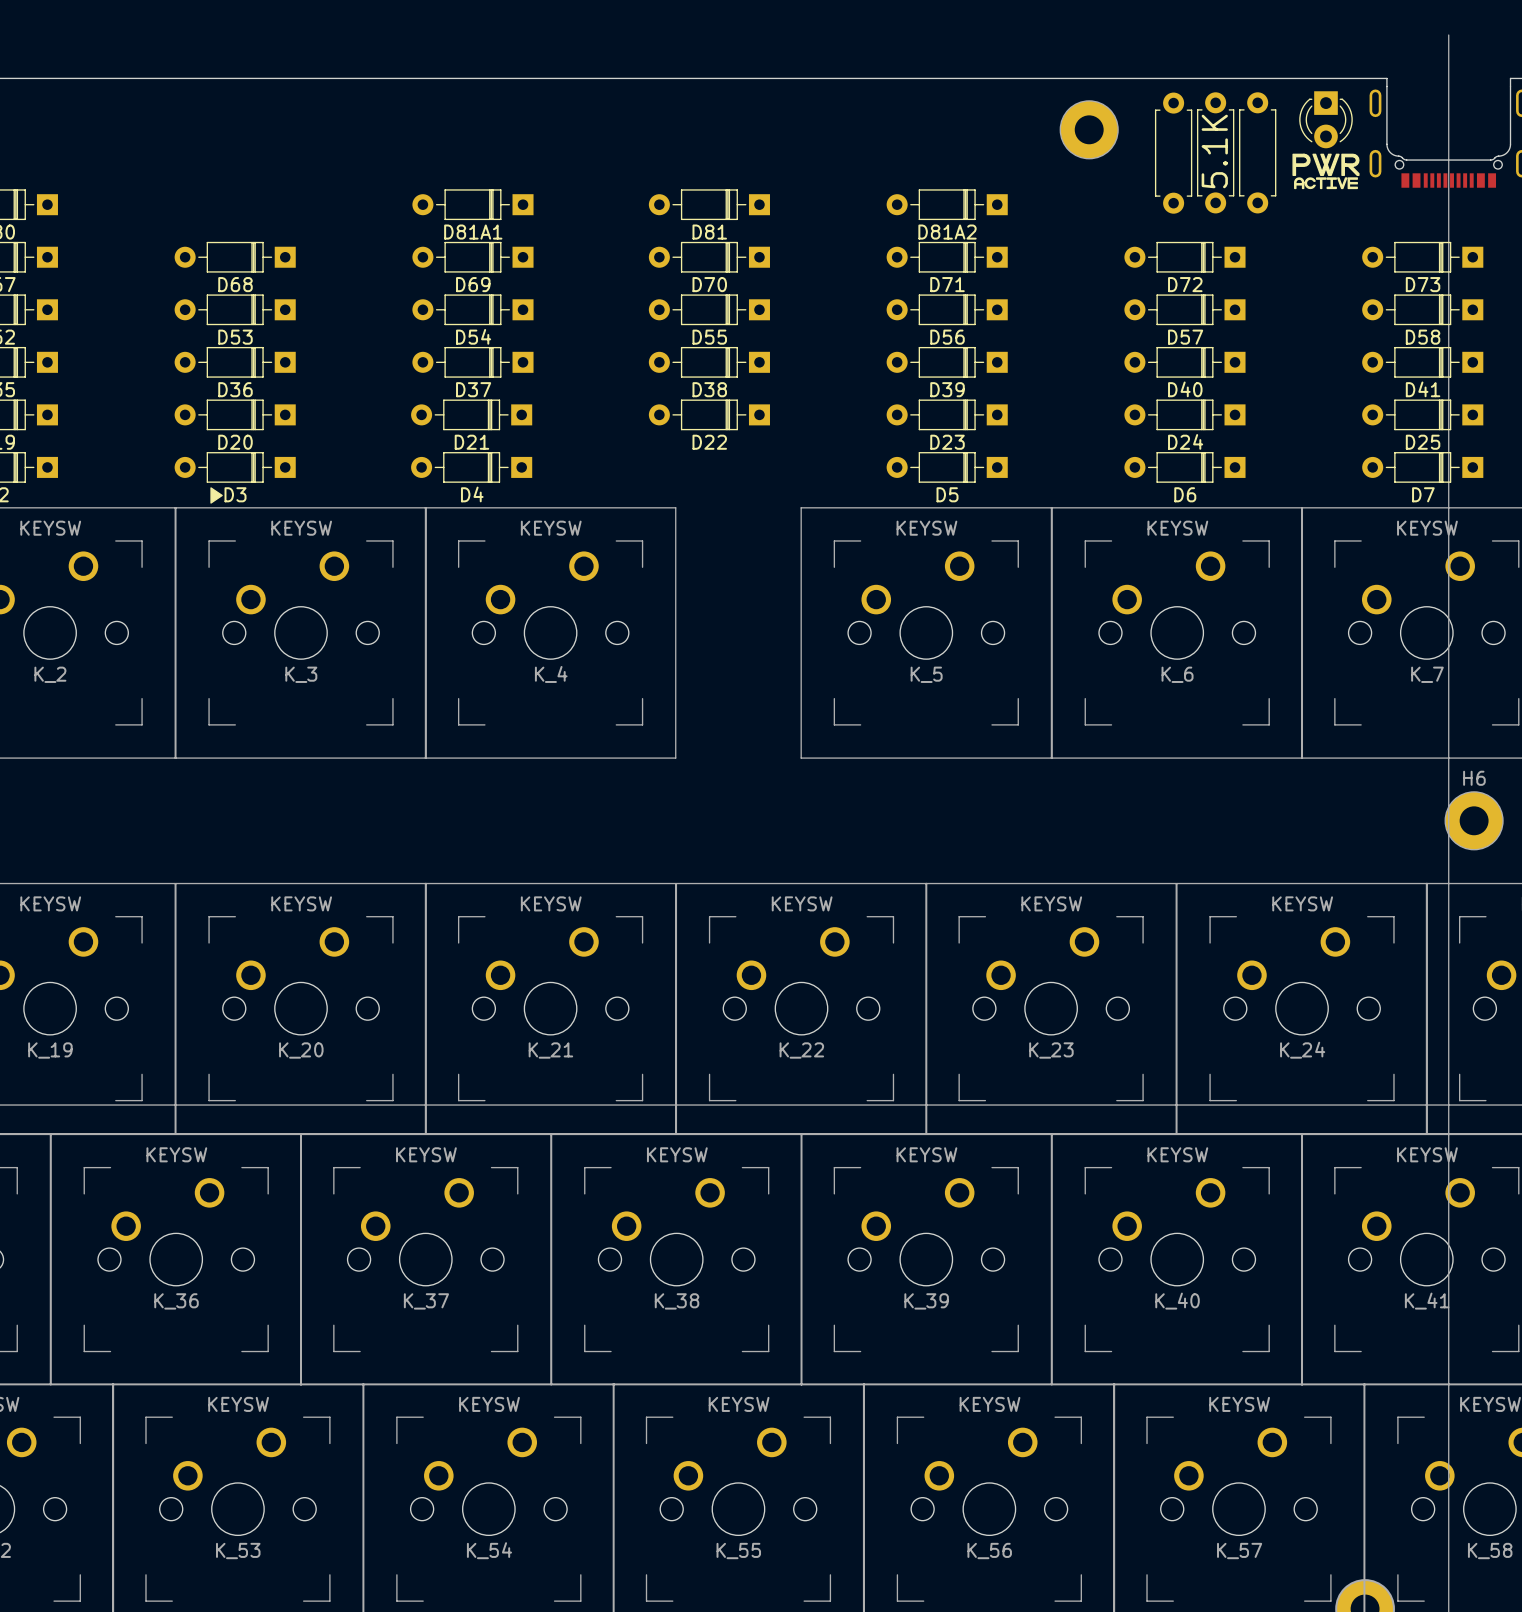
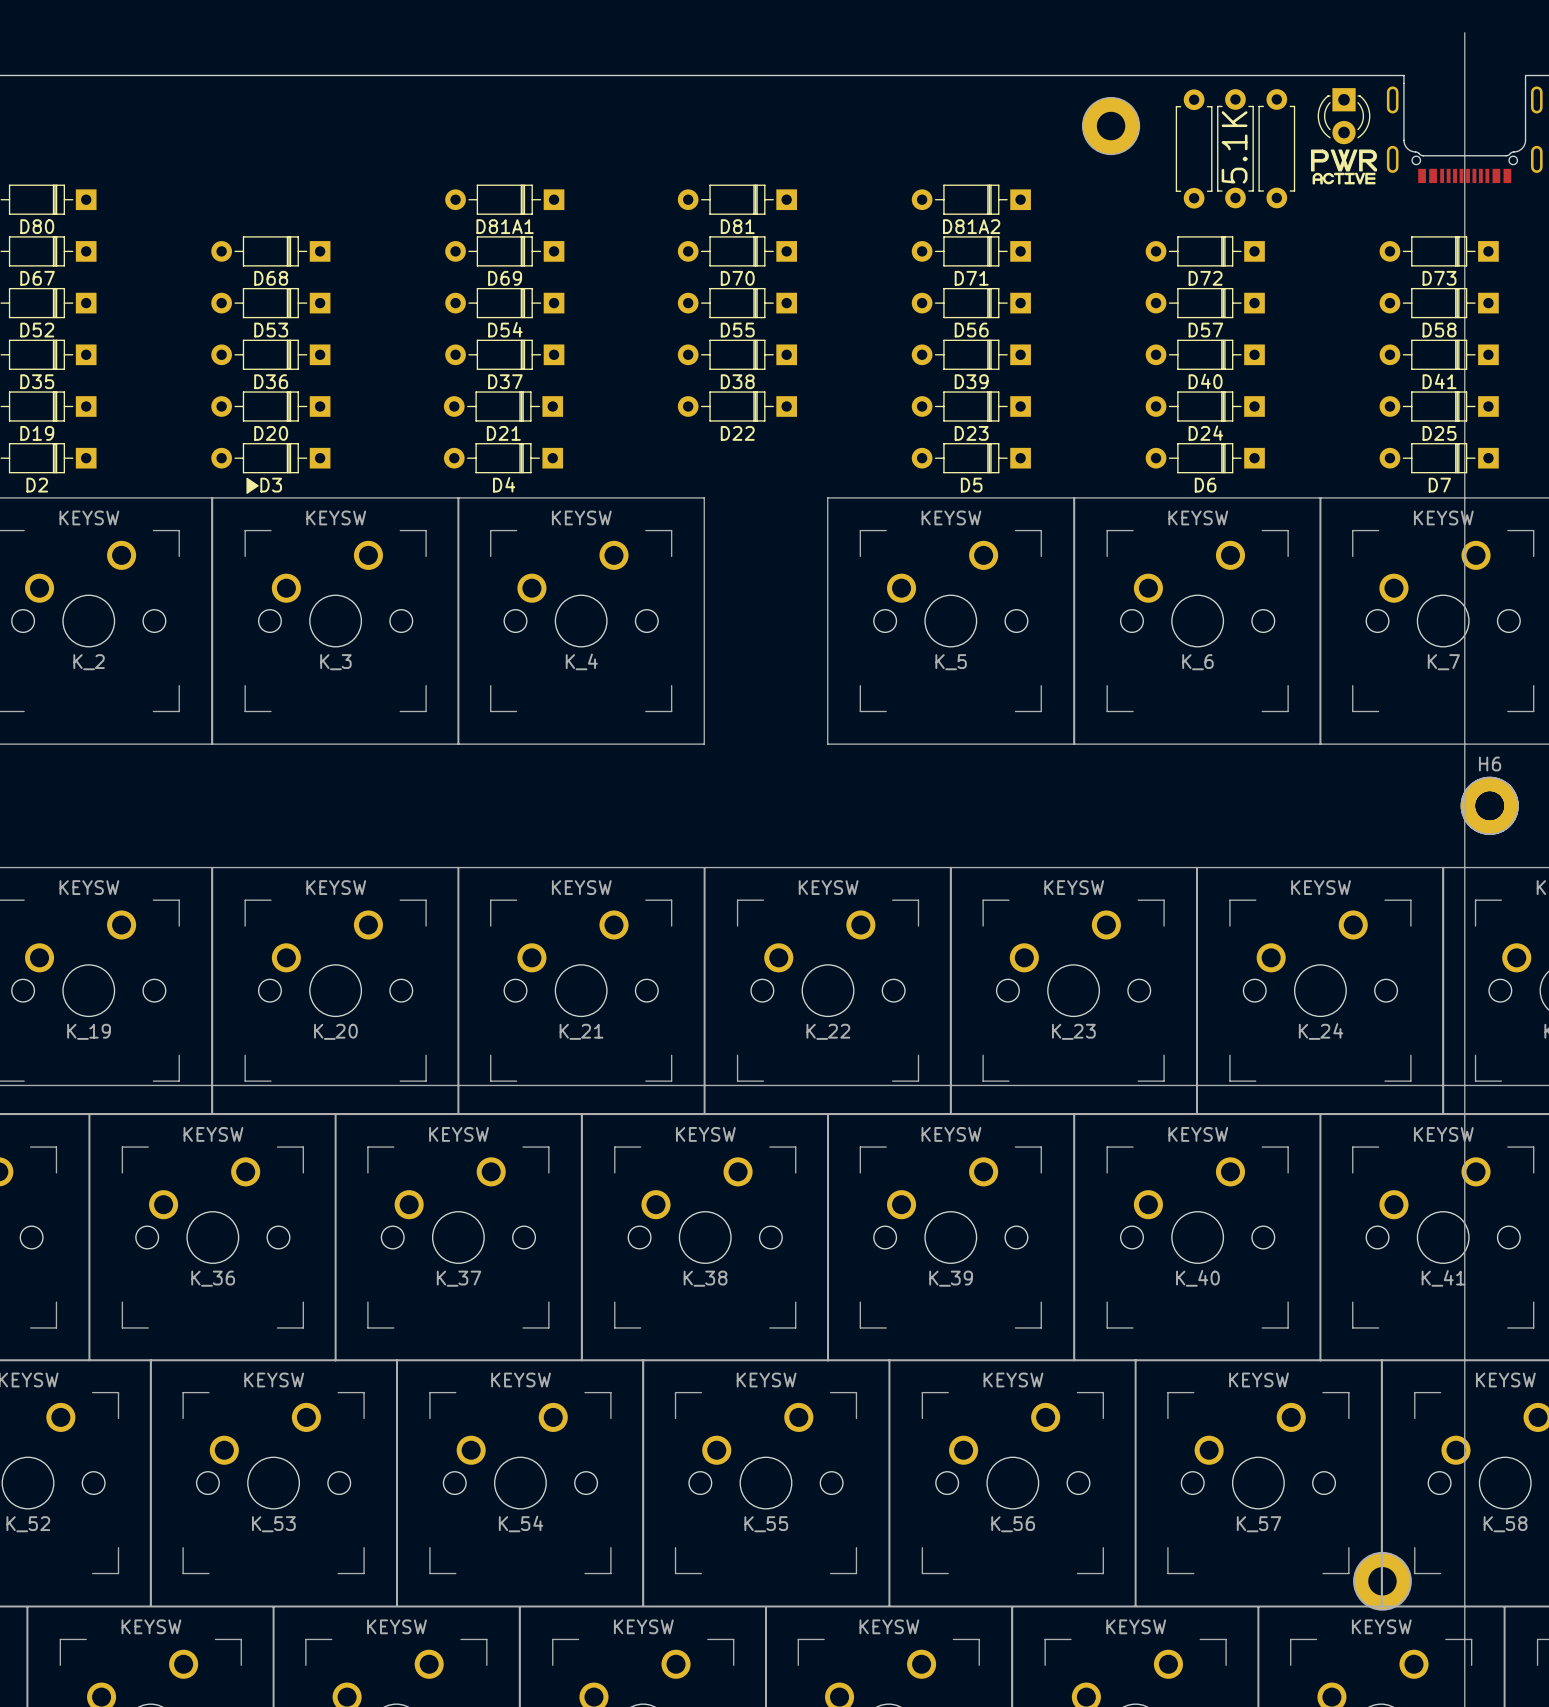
part: none -> (1489, 805)

